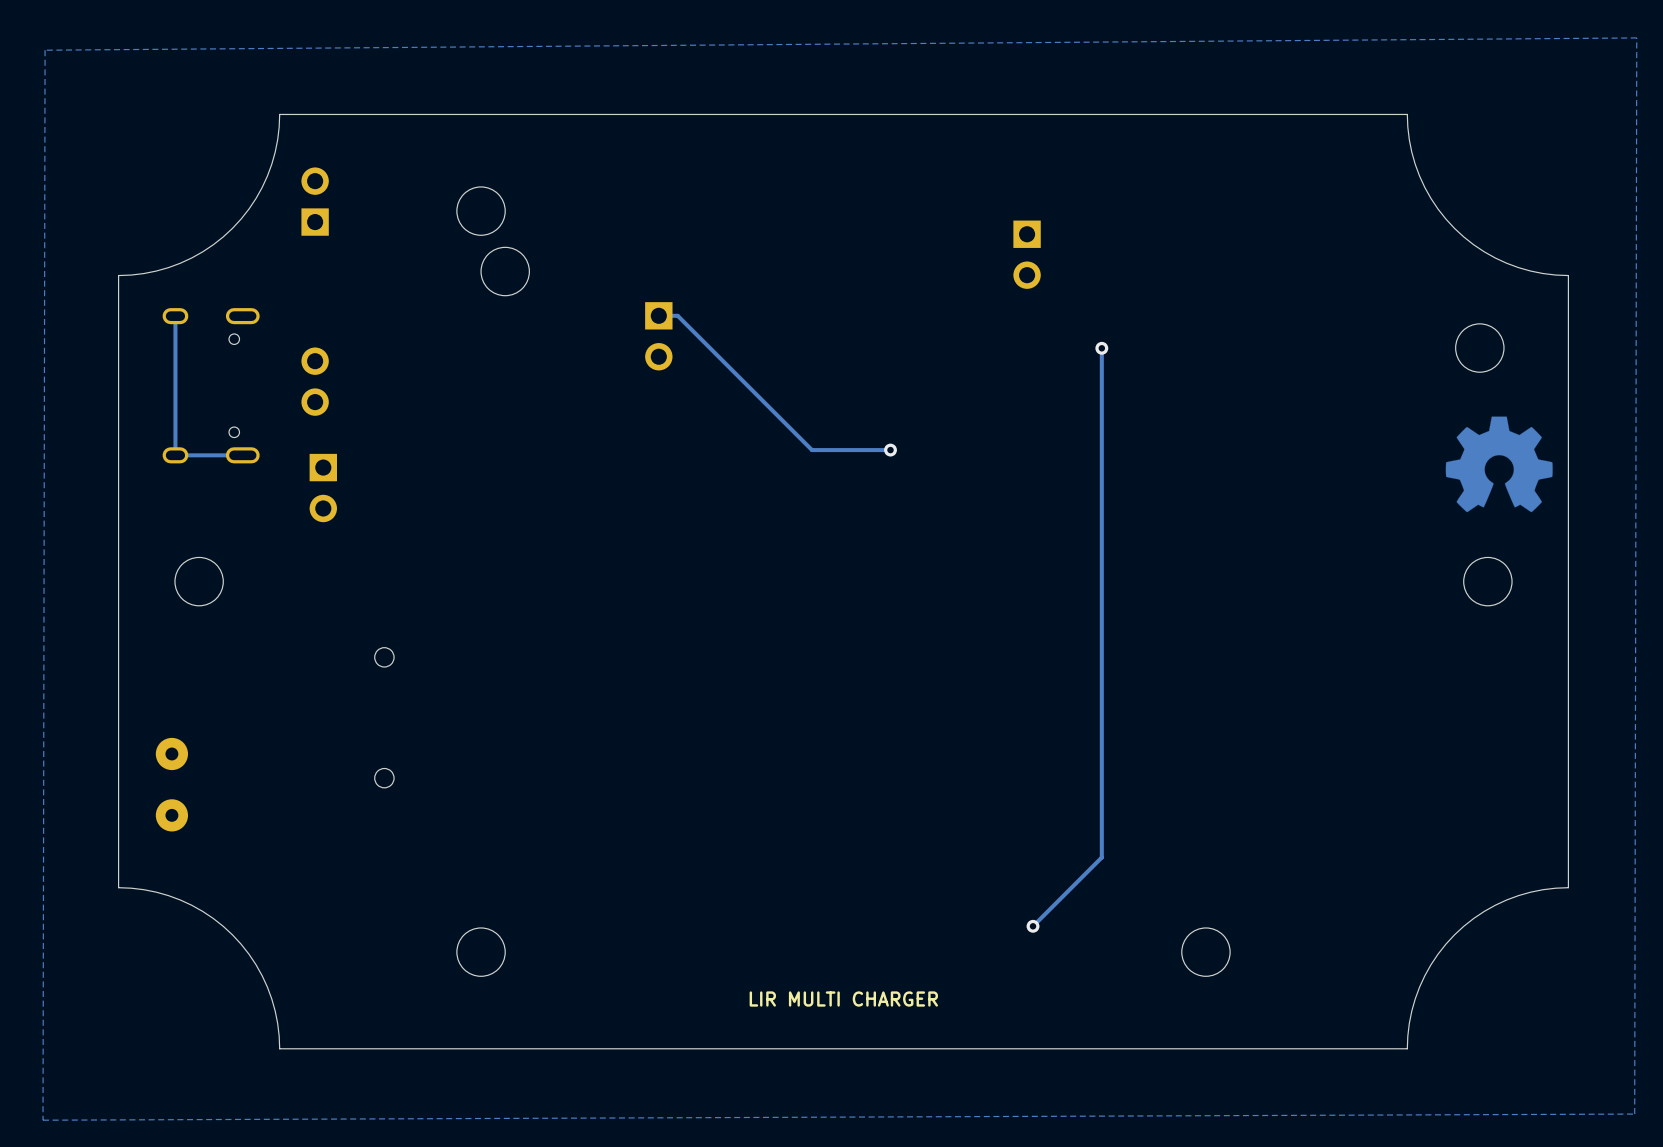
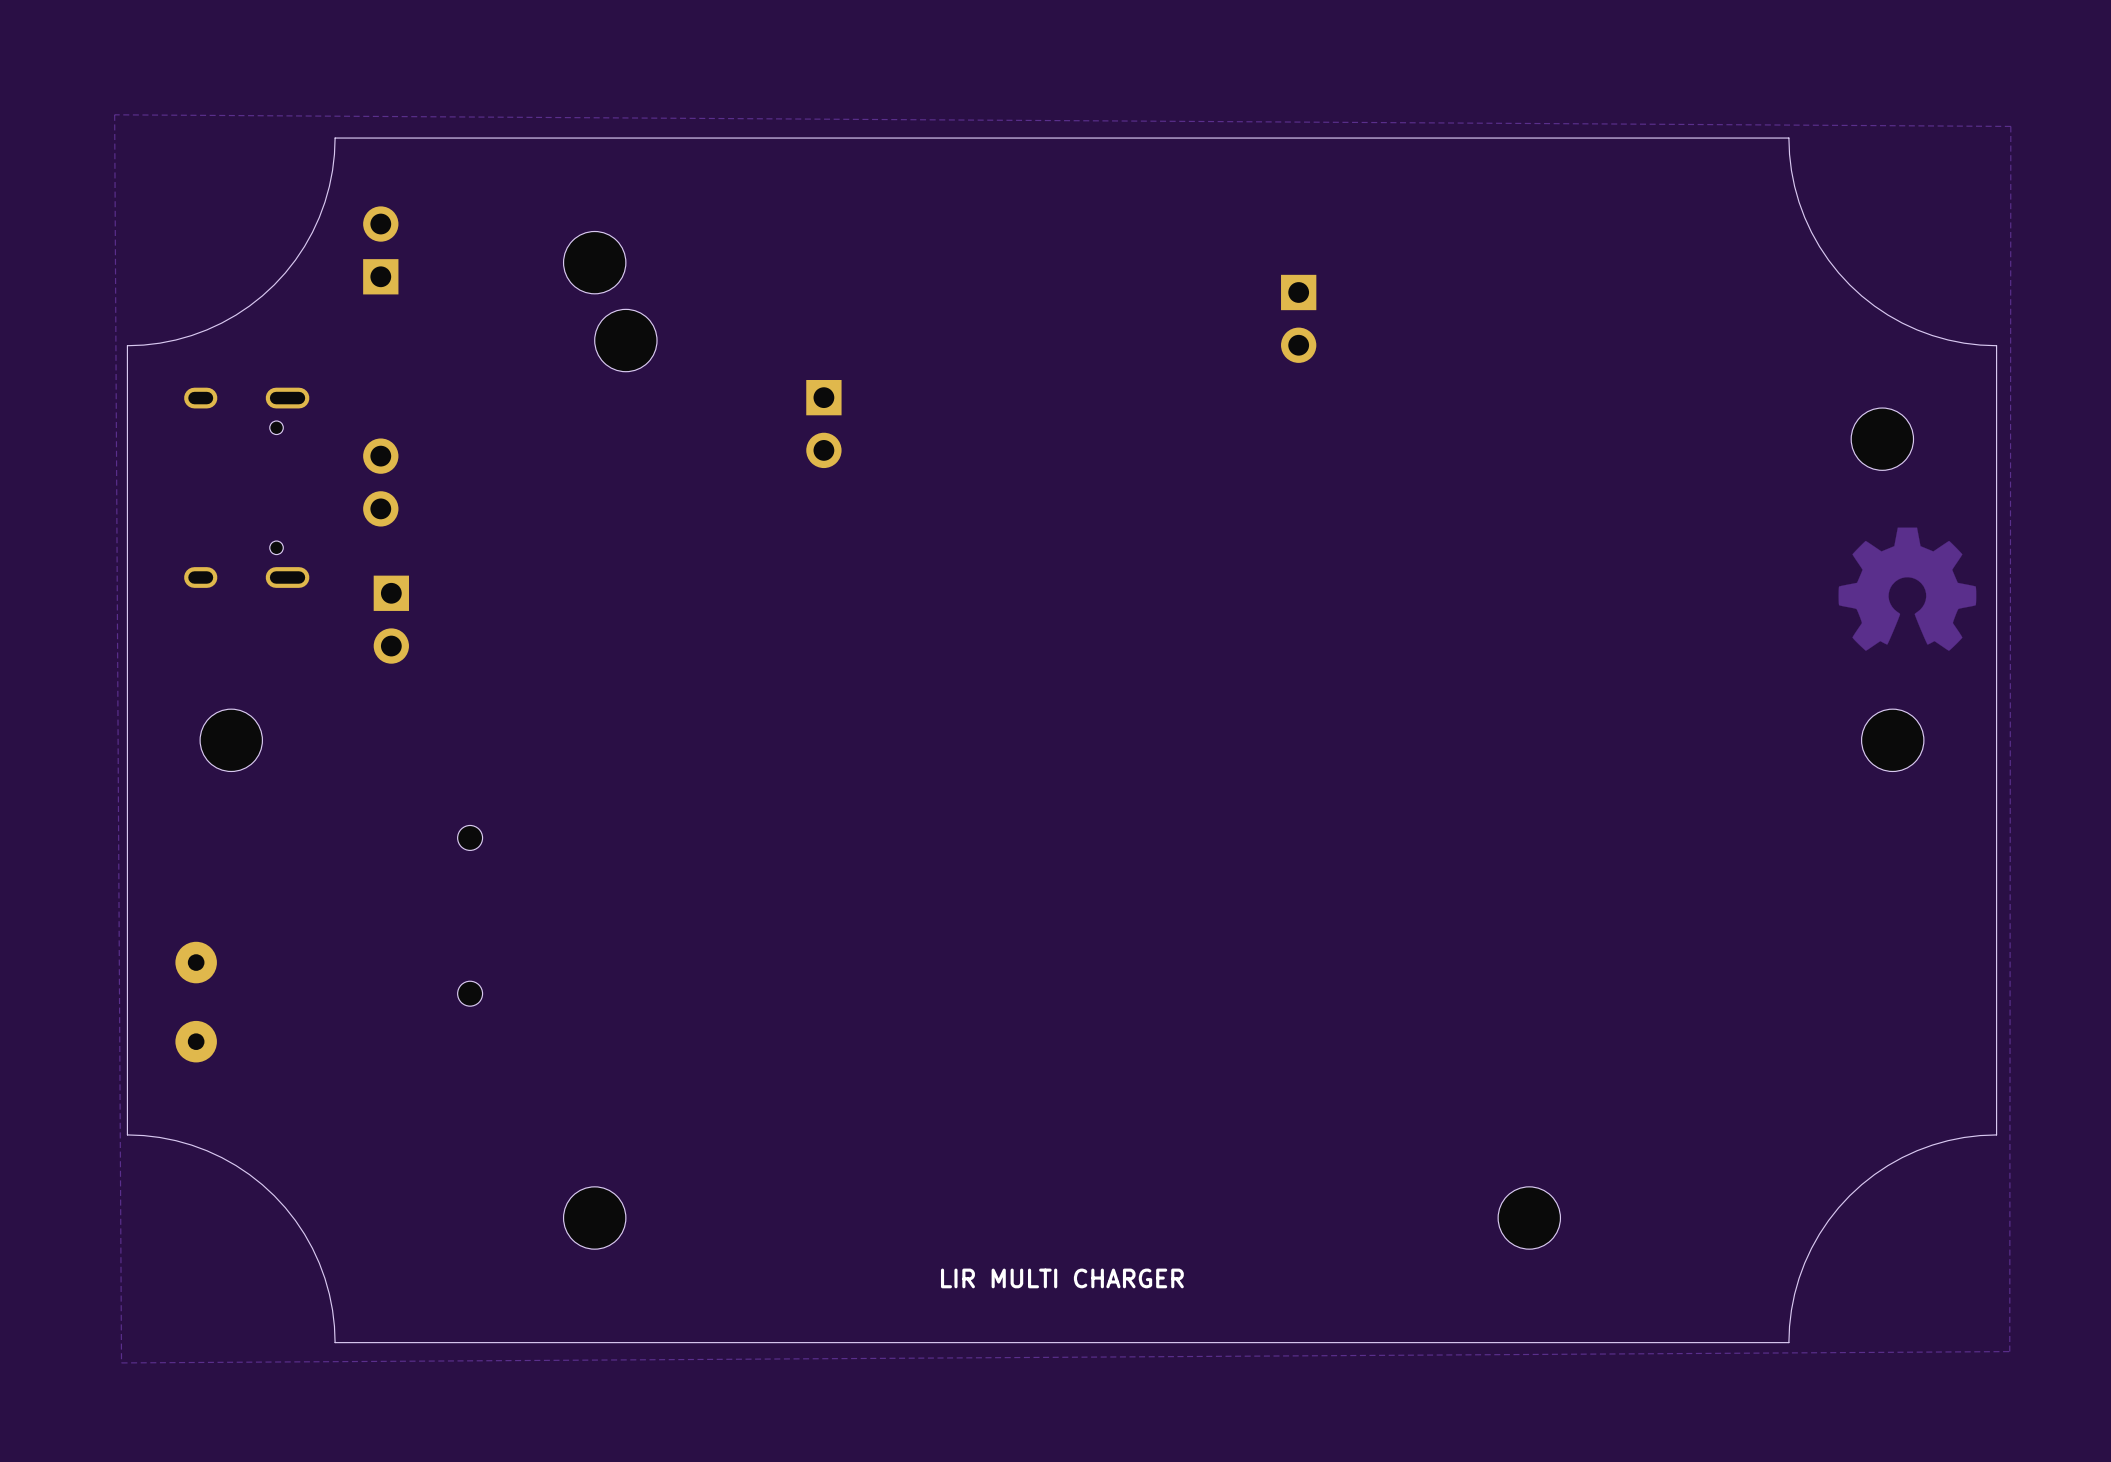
zone outline: (1636, 37) (1634, 1114) (43, 1120) (45, 50) (1636, 37) -> (114, 114) (2010, 126) (2009, 1351) (121, 1362) (114, 114)
track: (658, 315) (677, 315) (812, 450) (890, 450) -> none
track: (175, 316) (175, 455) (242, 455) -> none
track: (1101, 348) (1101, 857) (1033, 926) -> none
via: (1101, 348) -> none
via: (890, 450) -> none
via: (1033, 926) -> none

